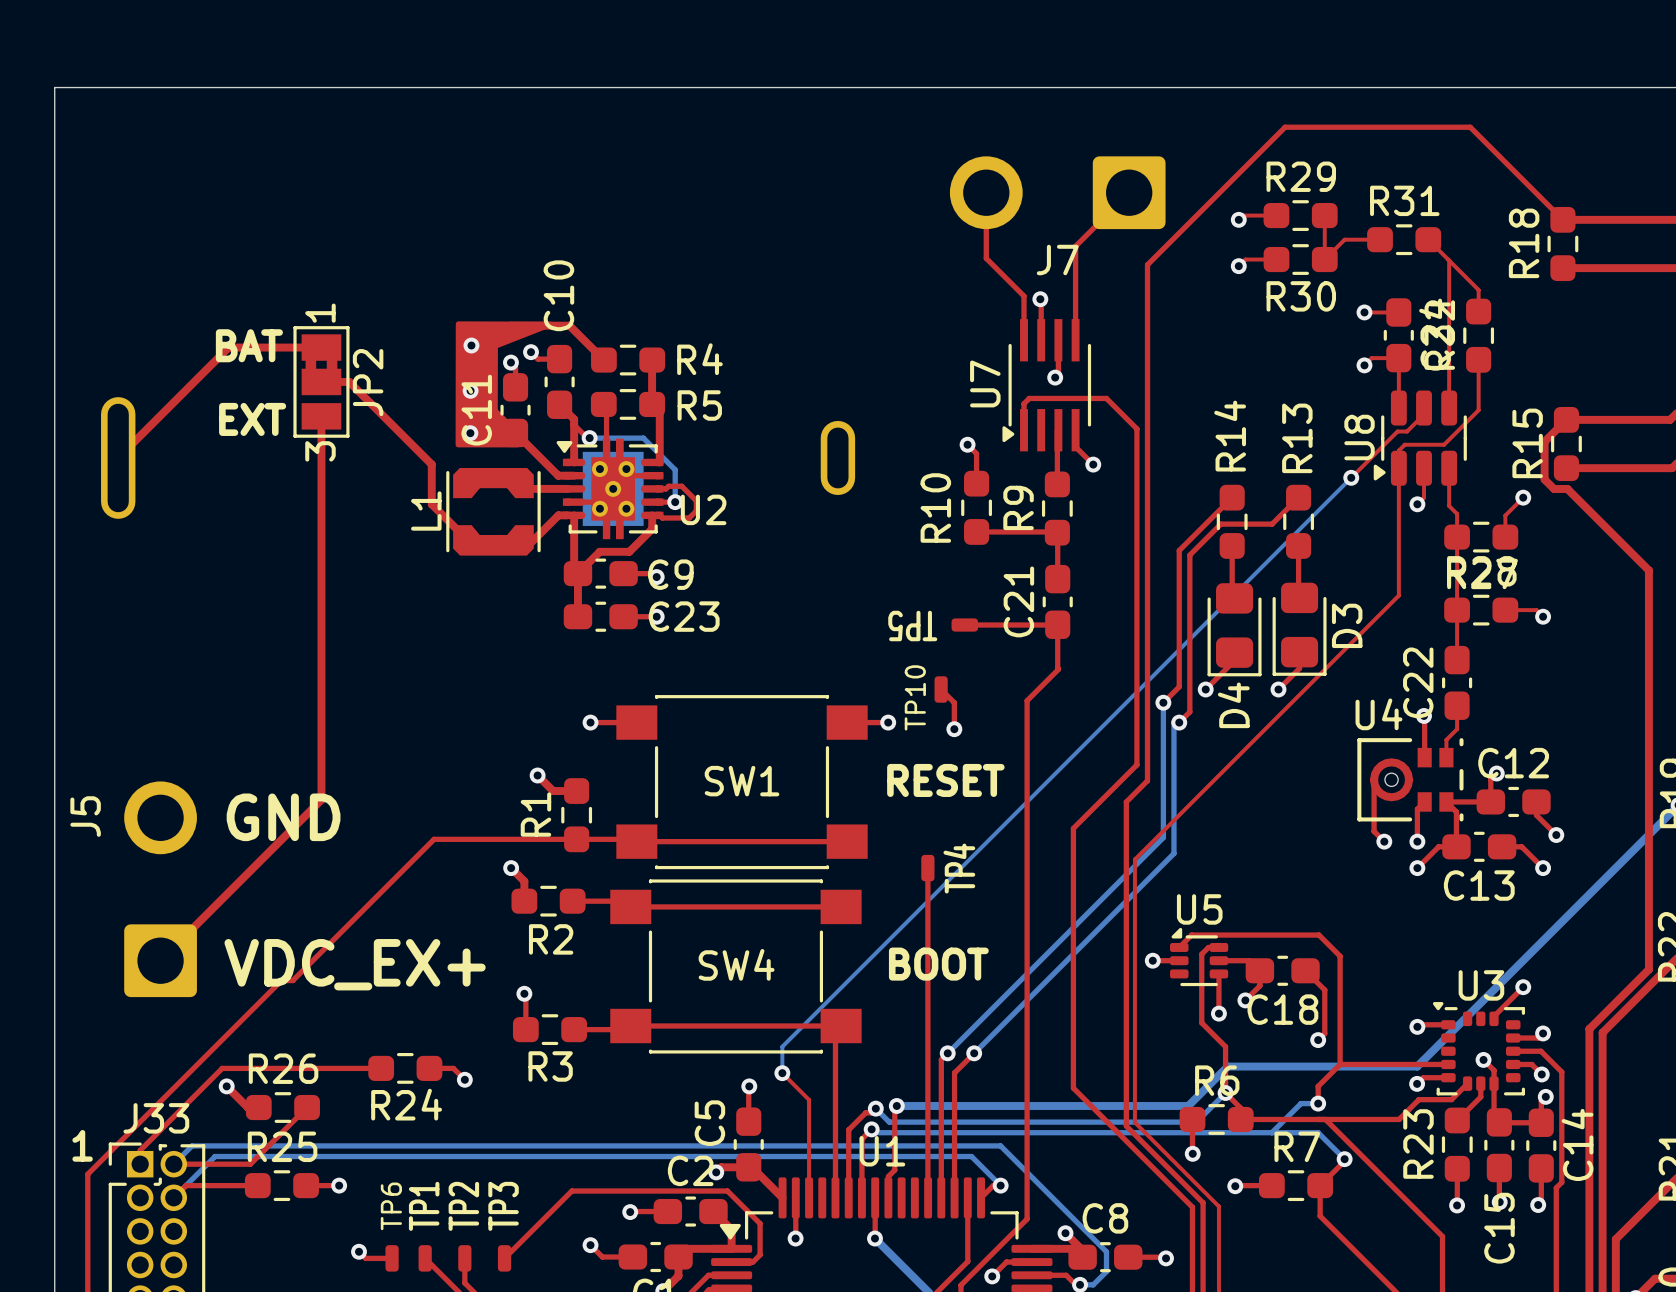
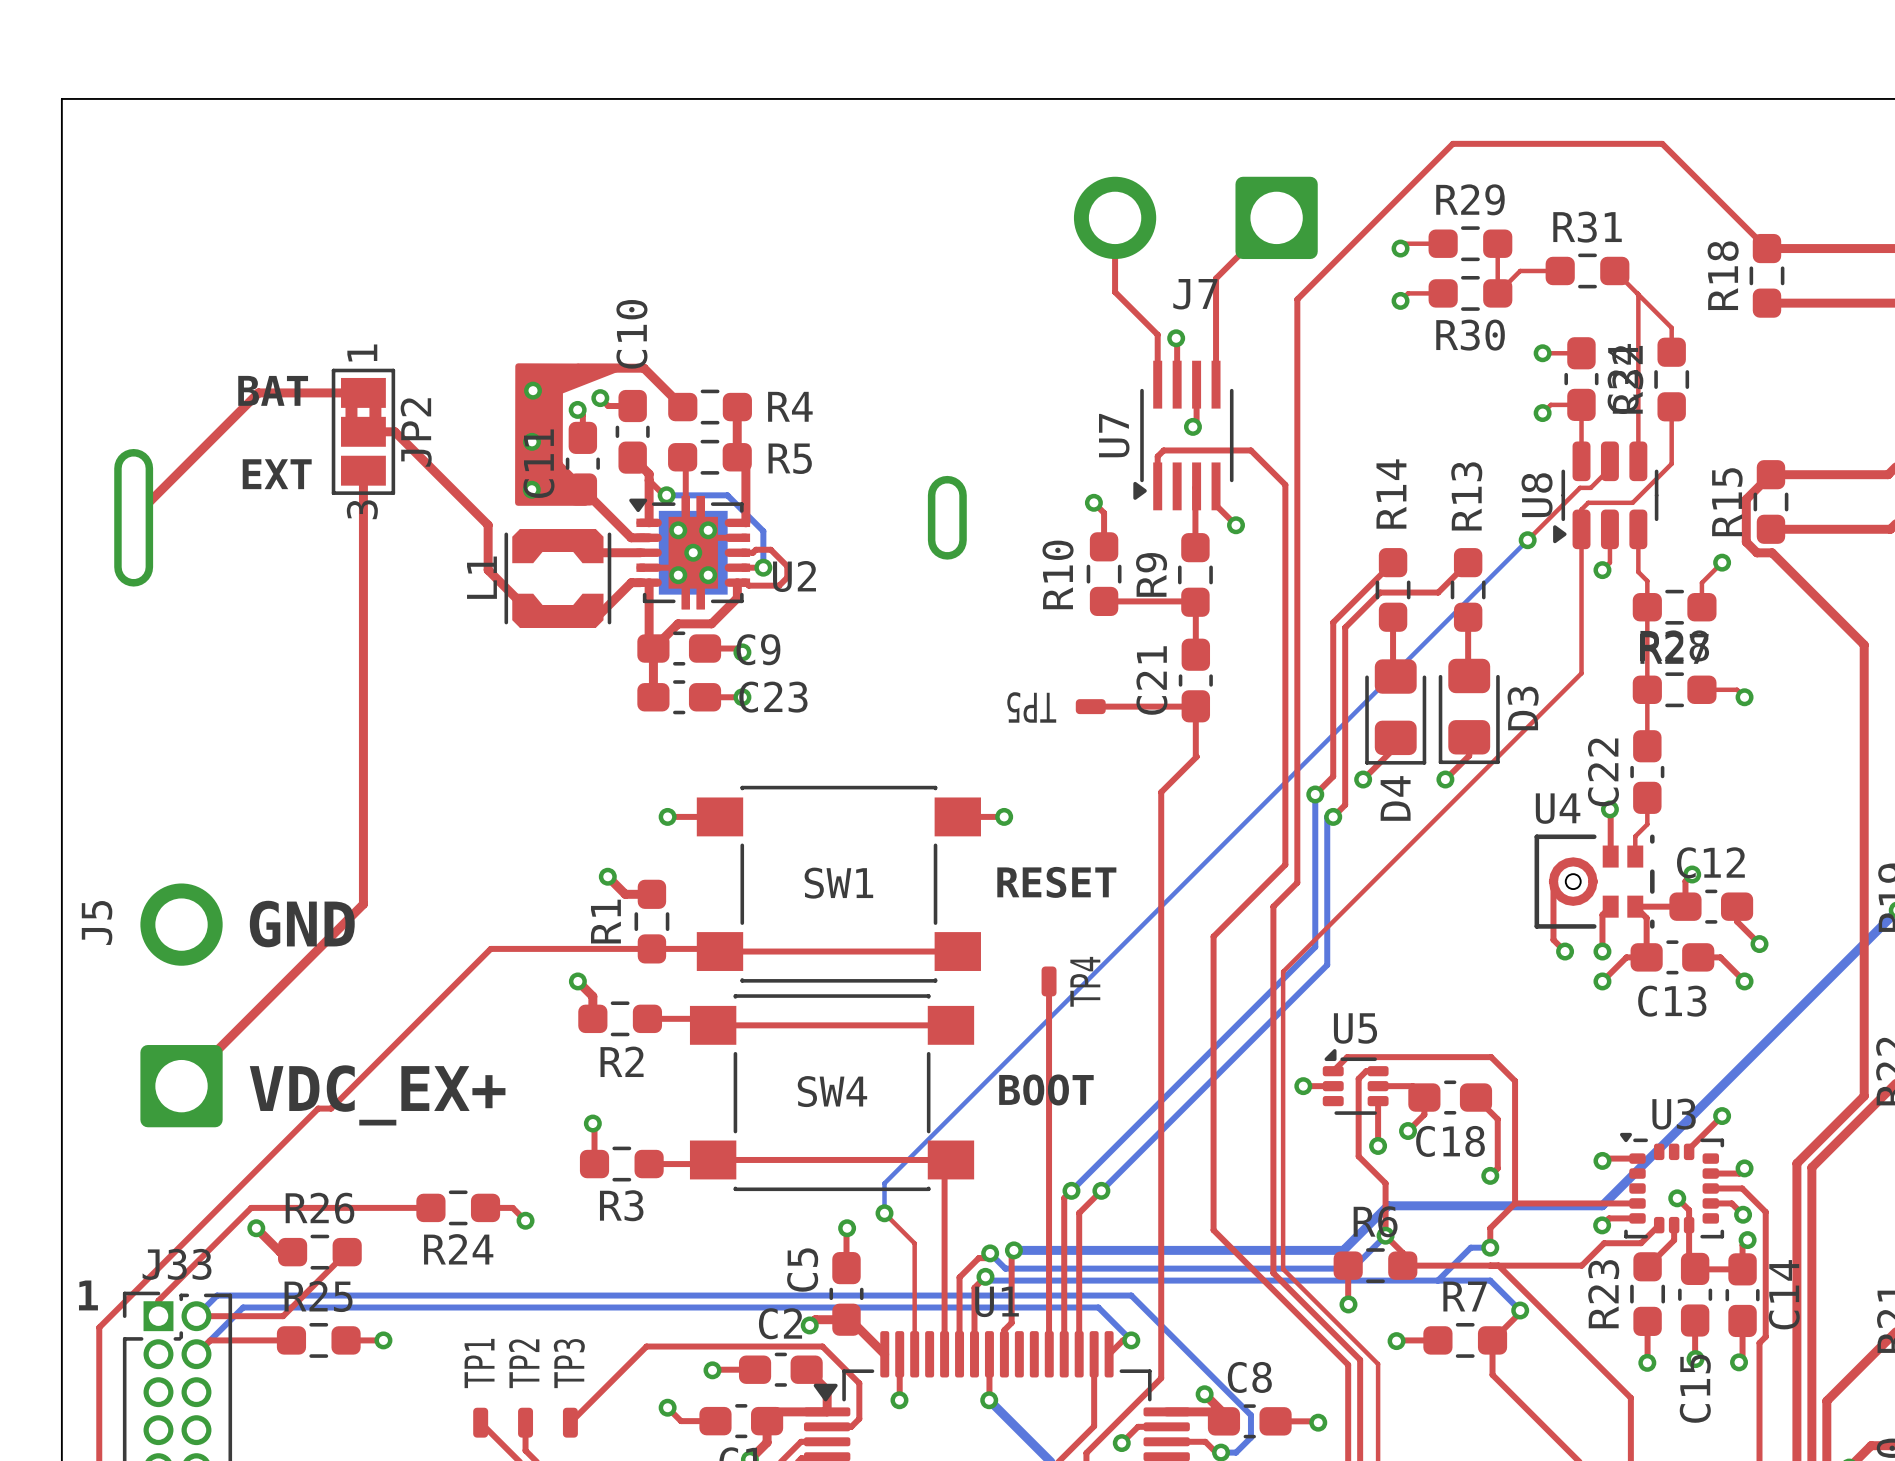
top track: (941, 689) (954, 702) (954, 729) -> none
TP10: (941, 689) -> none
via: (954, 729) -> none
top track: (359, 1251) (365, 1258) (392, 1258) -> none
via: (359, 1251) -> none
TP6: (392, 1258) -> none

